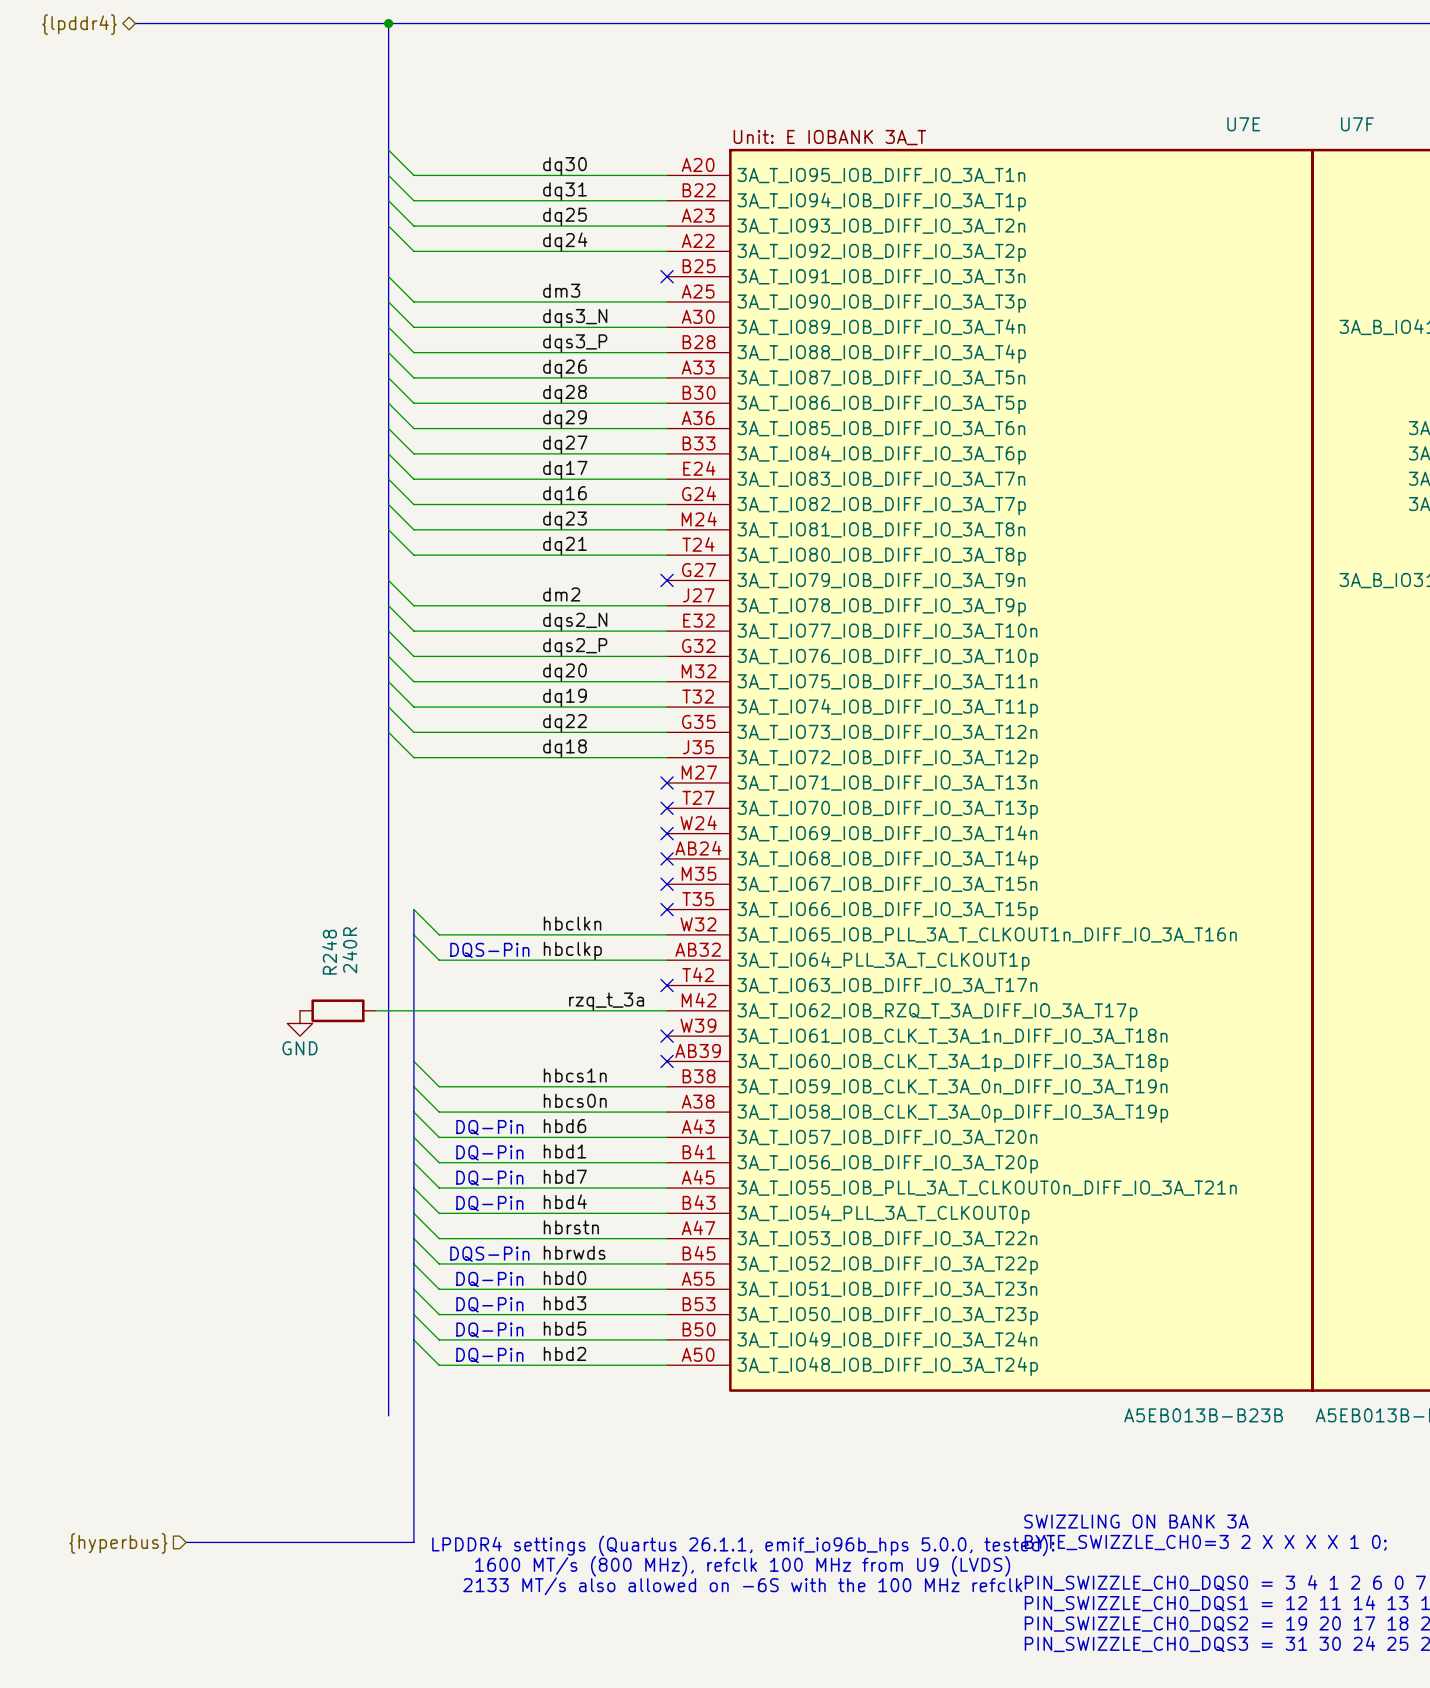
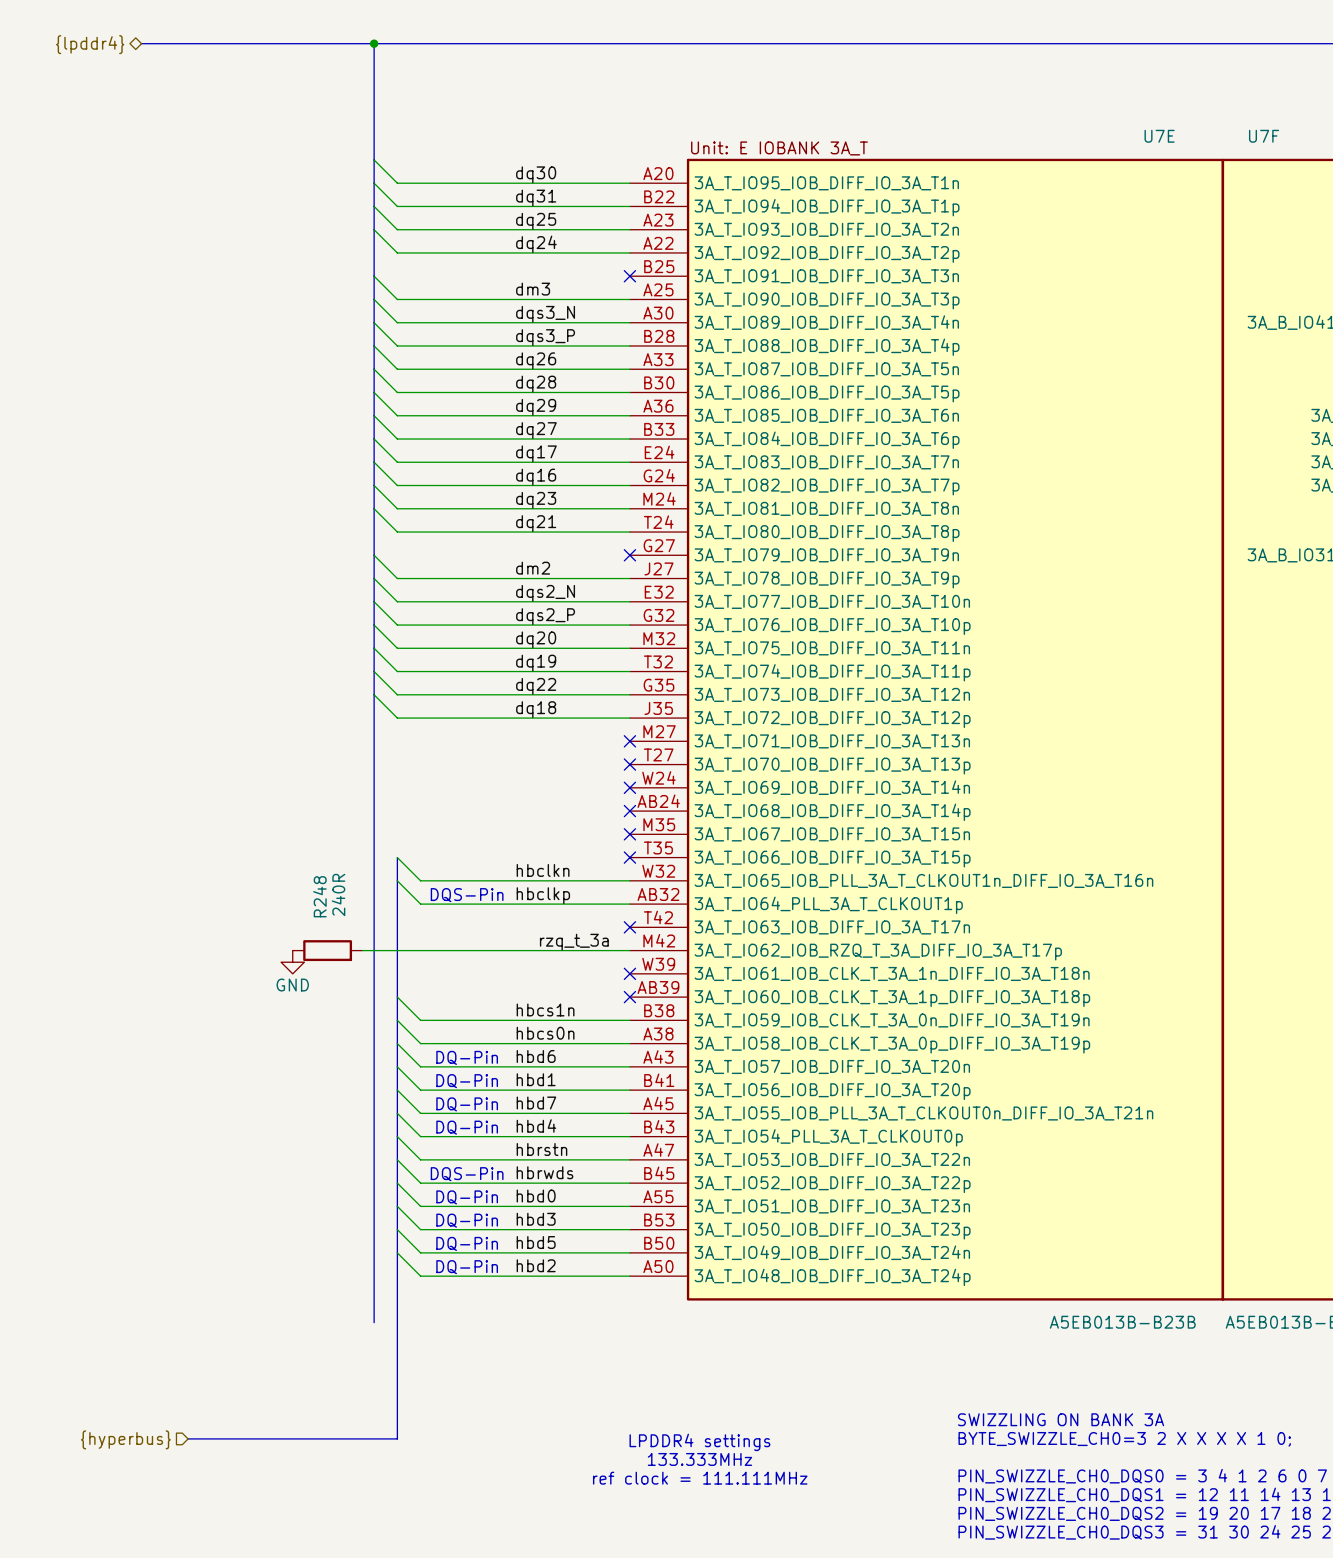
text: LPDDR4 settings (Quartus 26.1.1, emif_io96b_hps 5.0.0, tested): (743, 1545) -> LPDDR4 settings (699, 1442)
text: 1600 MT/s (800 MHz), refclk 100 MHz from U9 (LVDS) (742, 1566) -> 133.333MHz (699, 1459)
text: 2133 MT/s also allowed on -6S with the 100 MHz refclk (742, 1586) -> ref clock = 111.111MHz (700, 1478)

